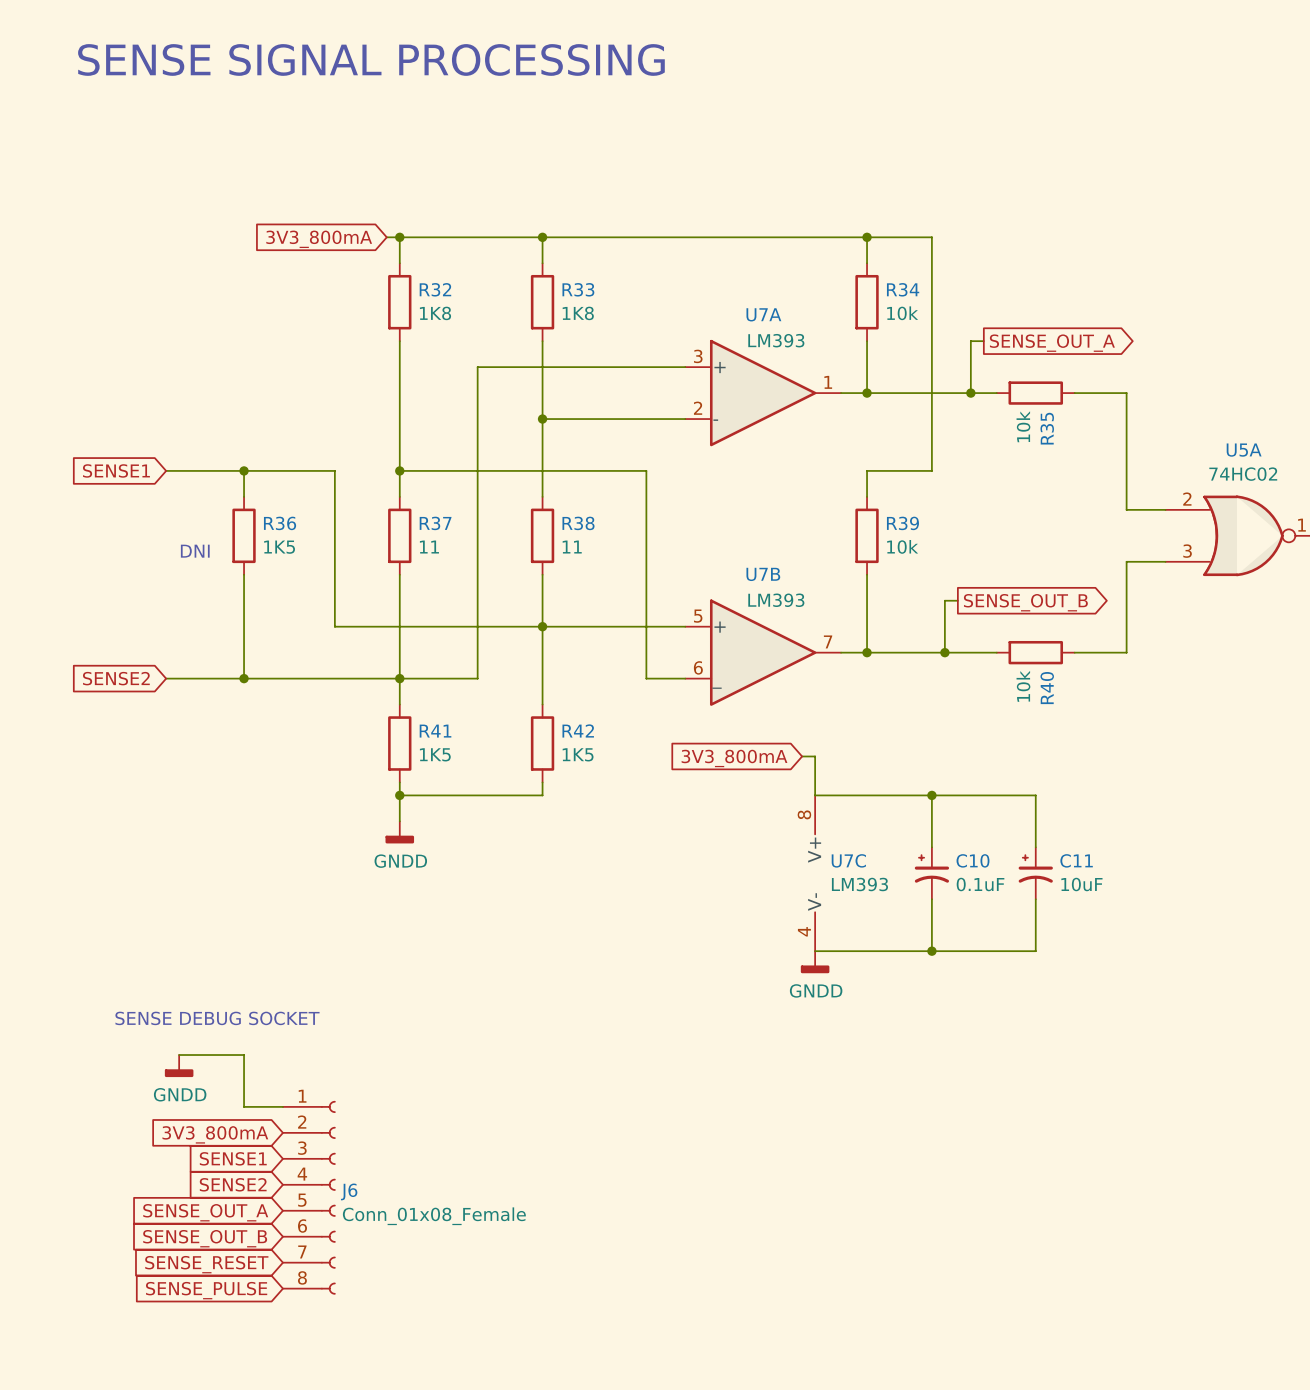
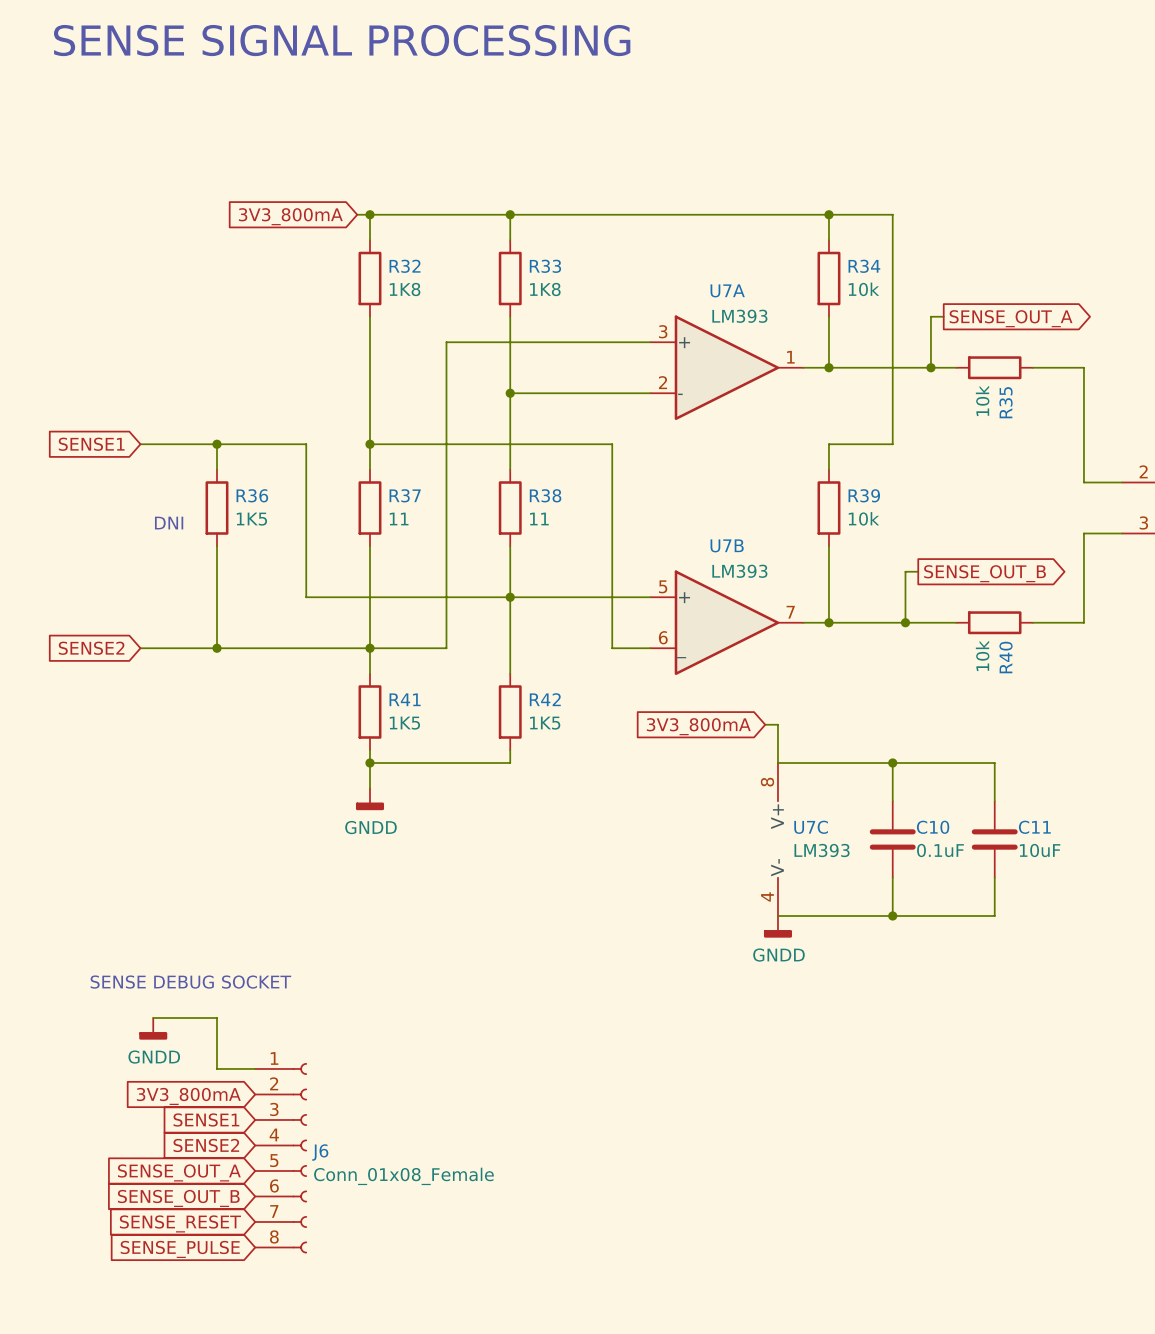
C10 symbol: [914, 847, 950, 900] -> [869, 801, 916, 878]
C11 symbol: [1018, 847, 1053, 900] -> [971, 801, 1018, 878]

